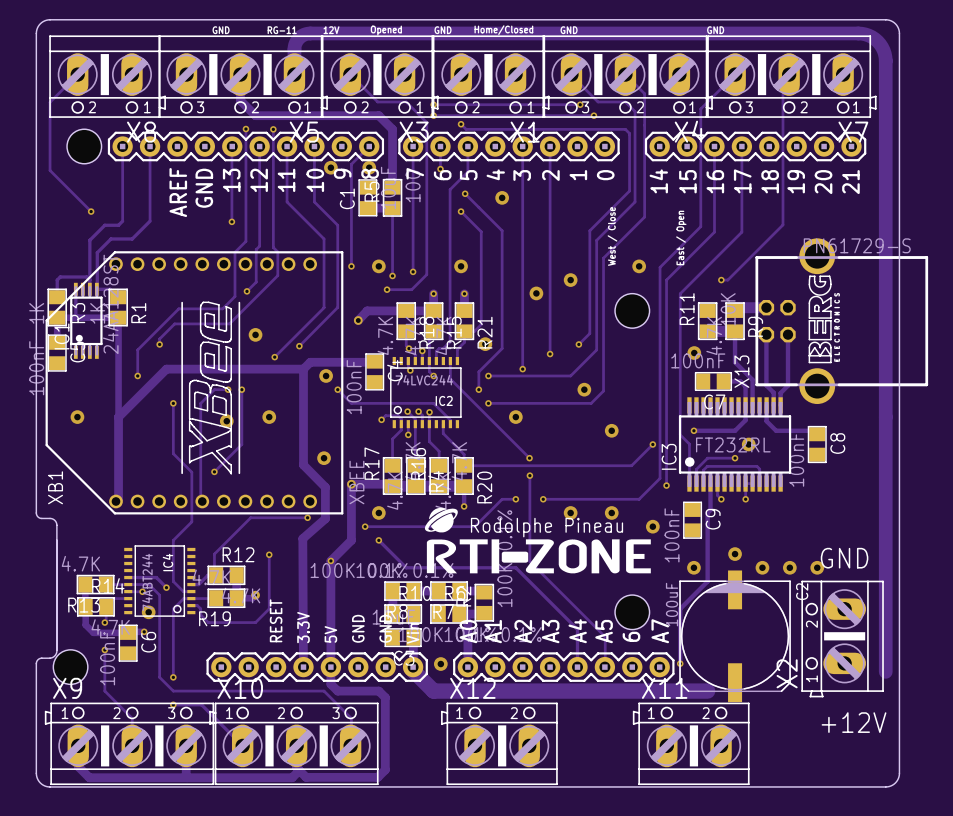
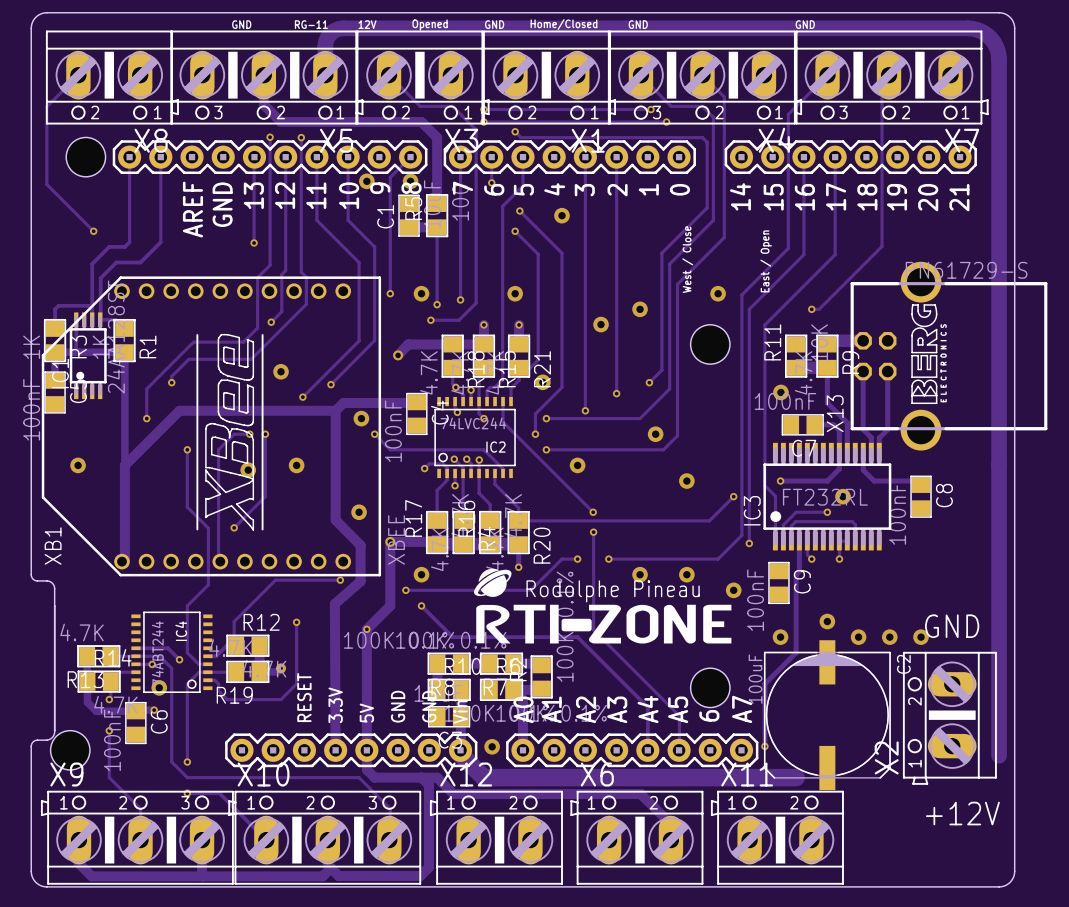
track: none -> (421, 777) (437, 777) (453, 794) (641, 794) (671, 824) (670, 840)
X12 position: (499, 743) -> (496, 837)
X6: none -> (636, 837)

